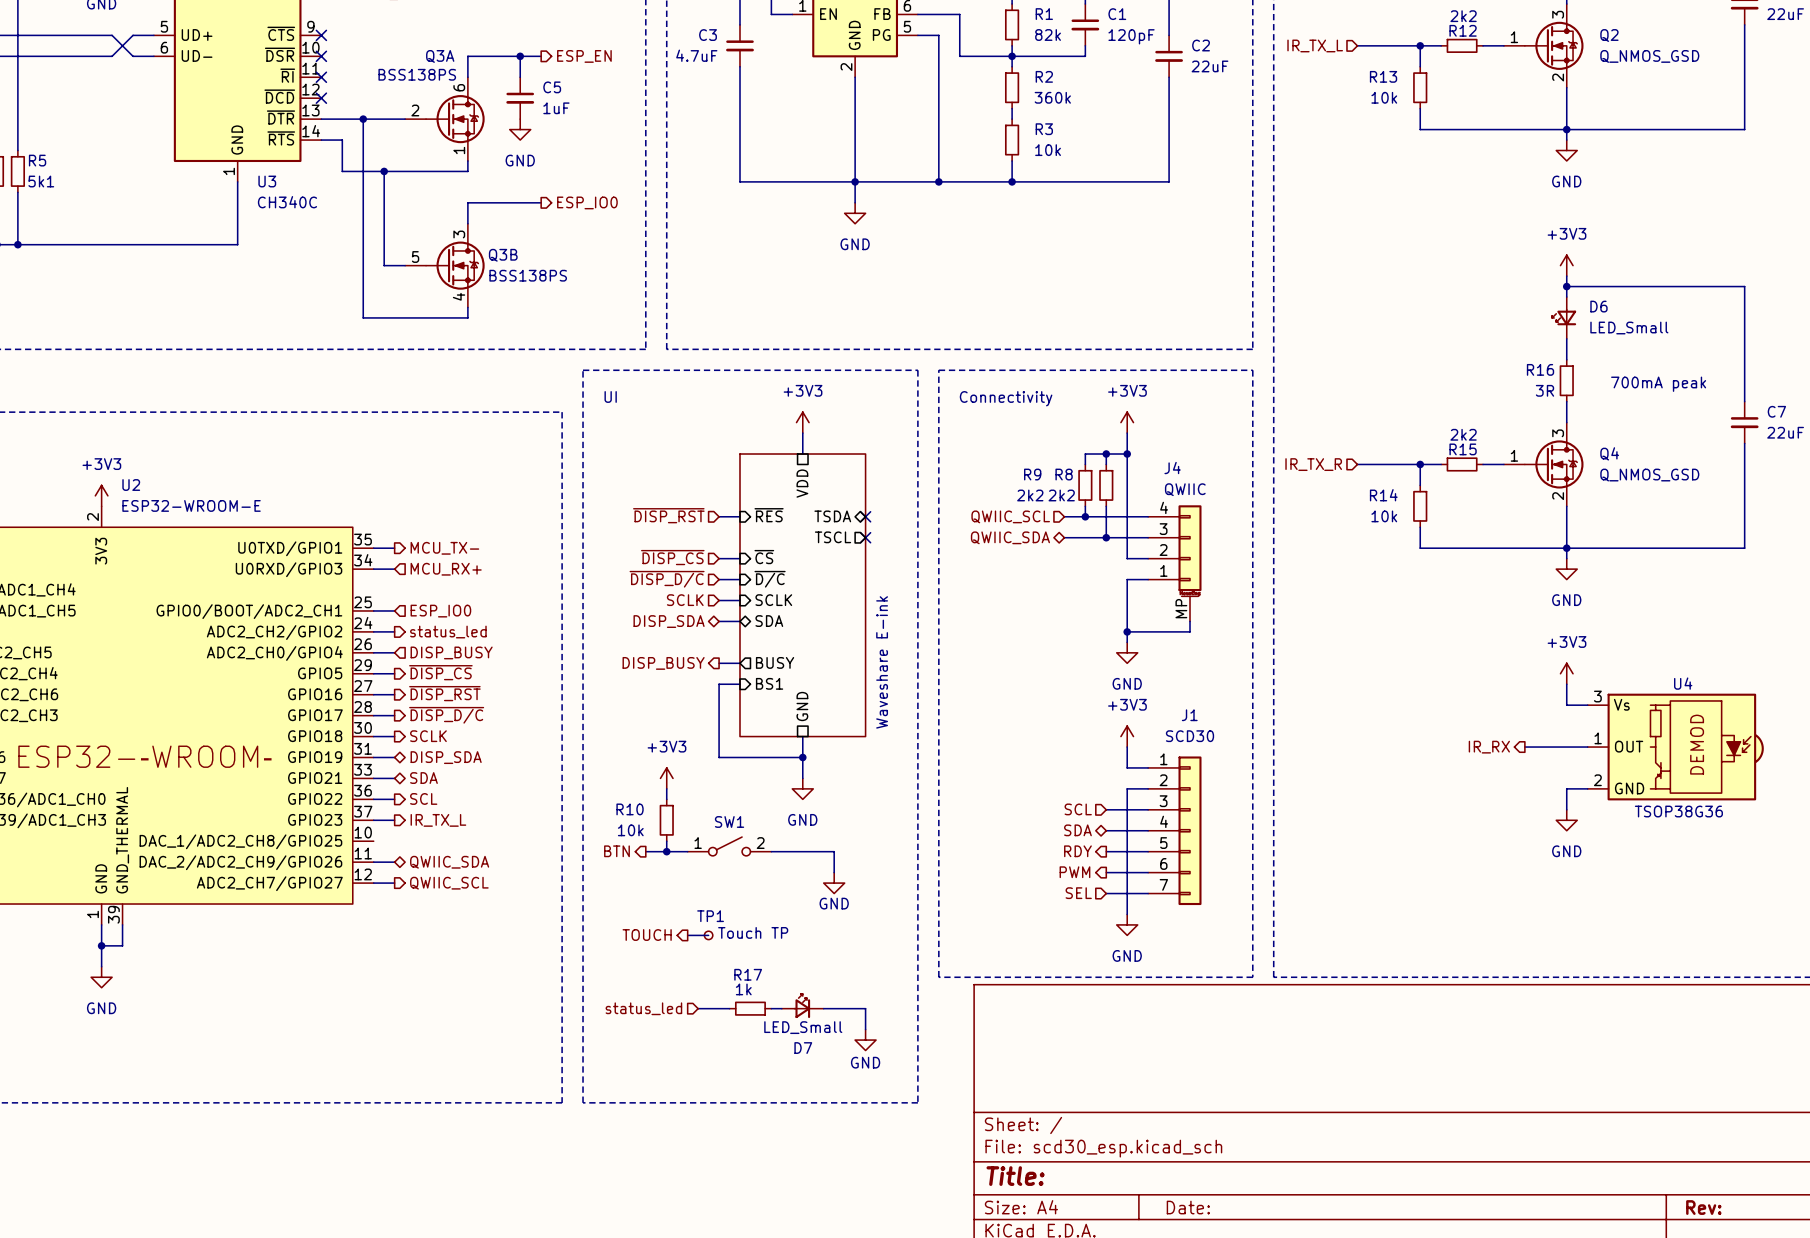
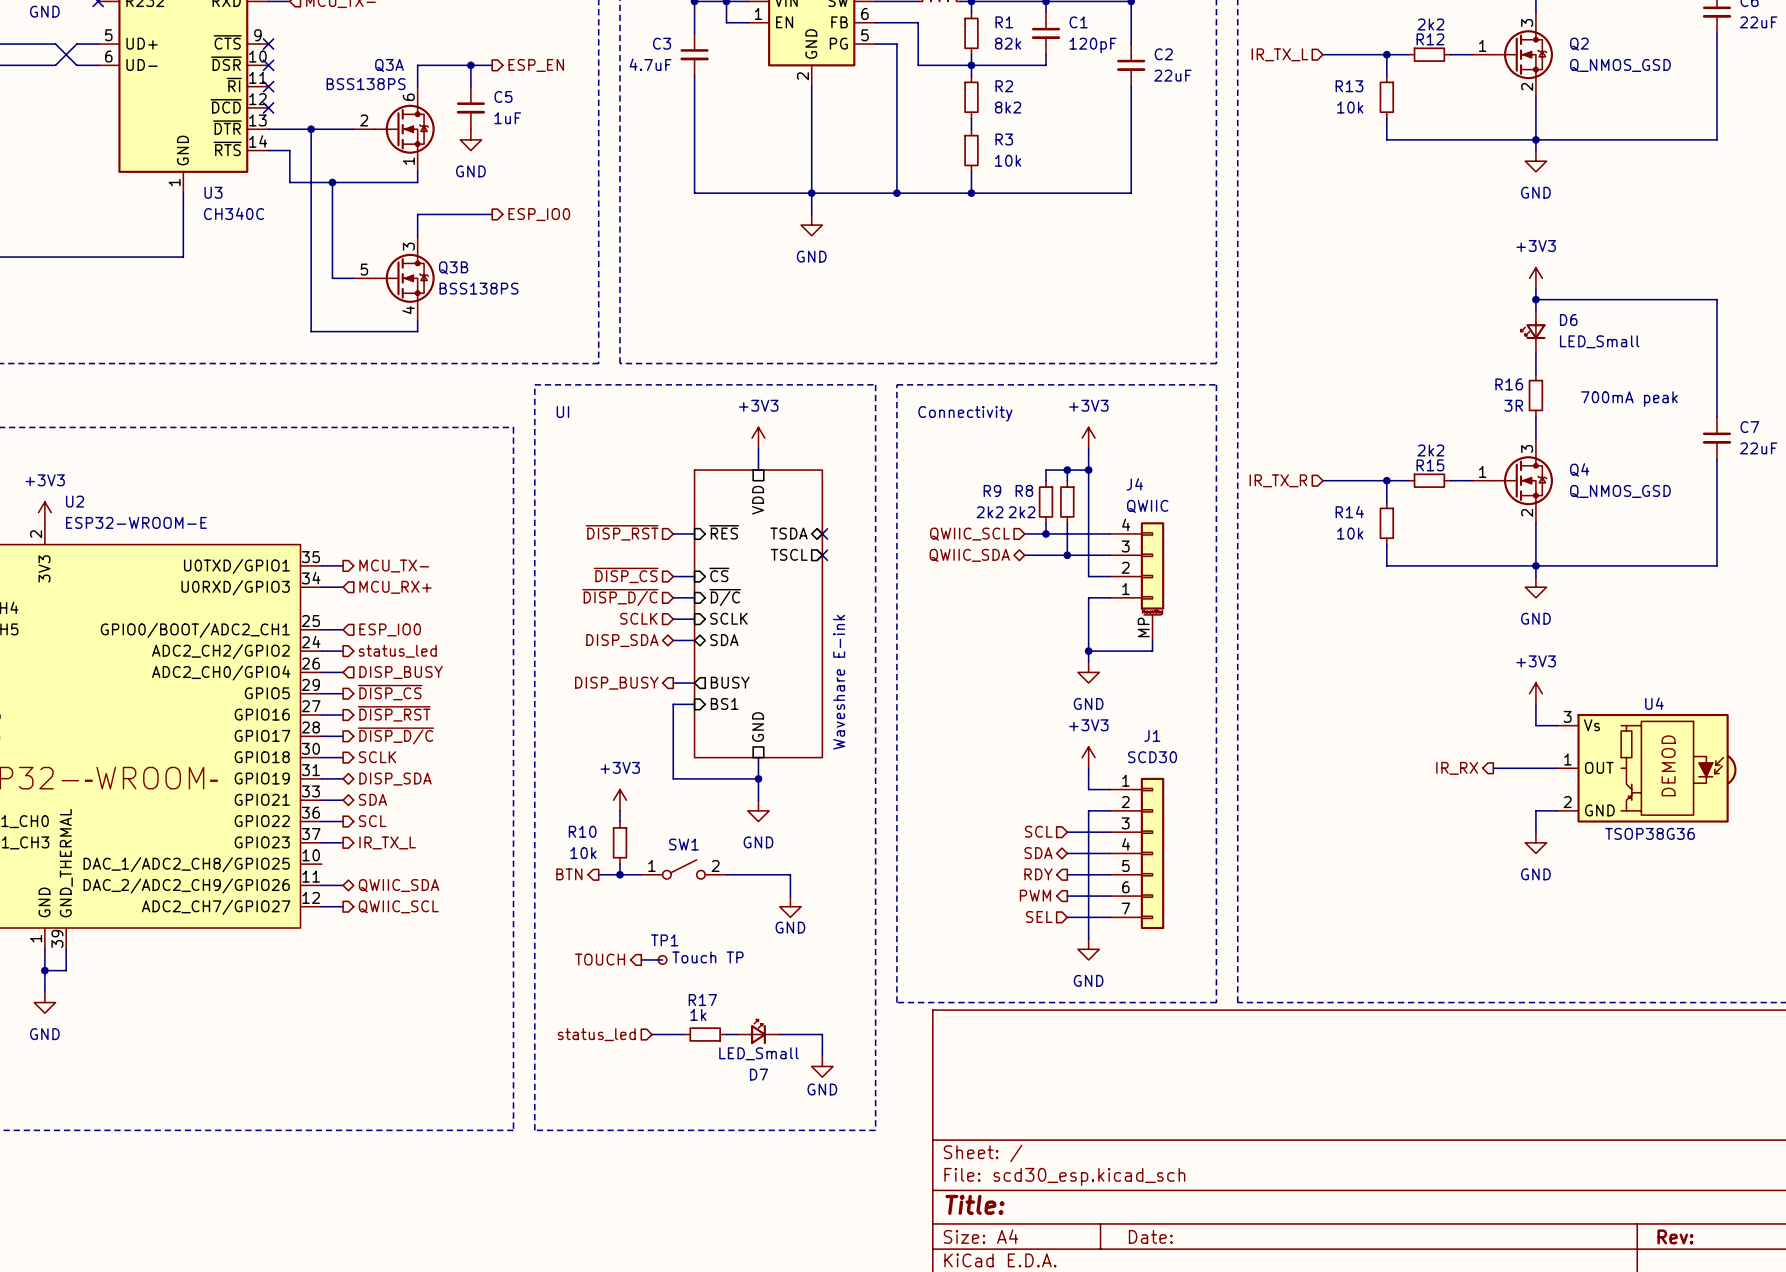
R2 value: 360k (1052, 97) -> 8k2 (1008, 107)

